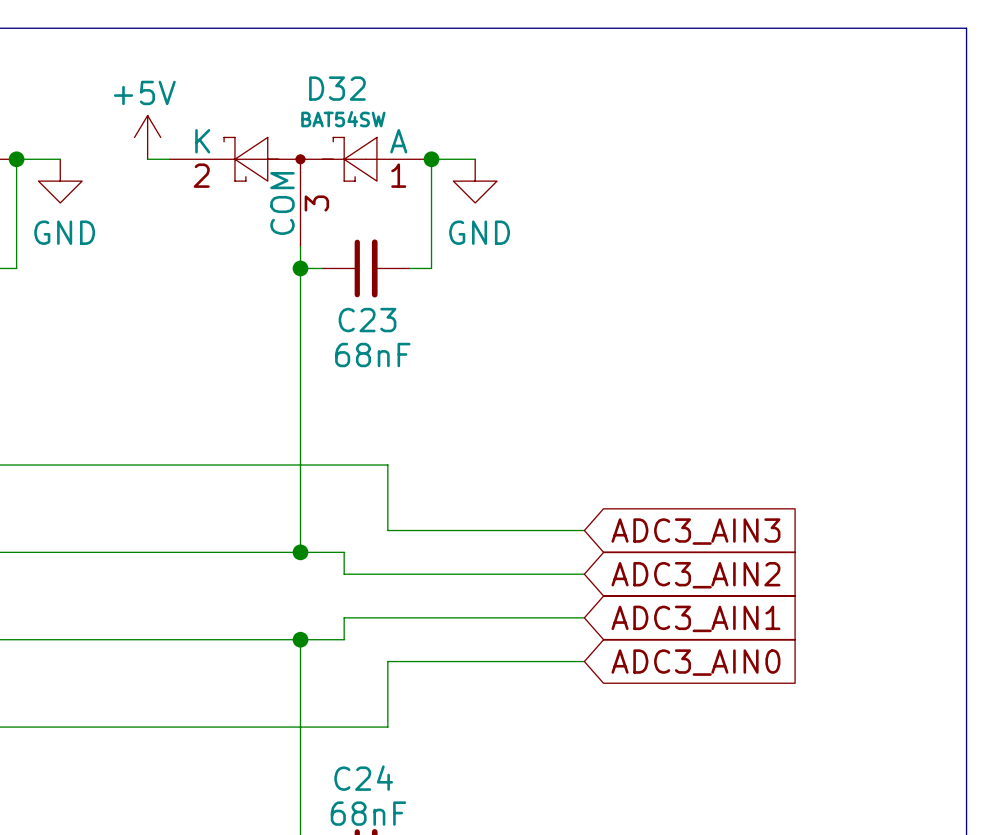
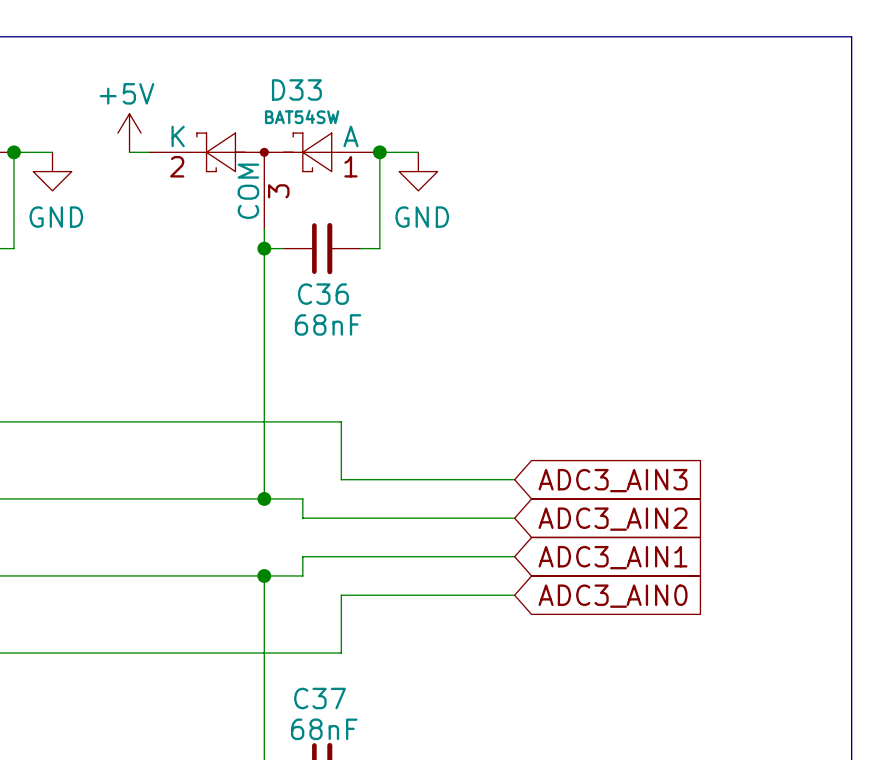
D32 name: D32 (337, 88) -> D33 (296, 89)
C23 name: C23 (367, 320) -> C36 (323, 294)
C24 name: C24 (363, 778) -> C37 (320, 698)

